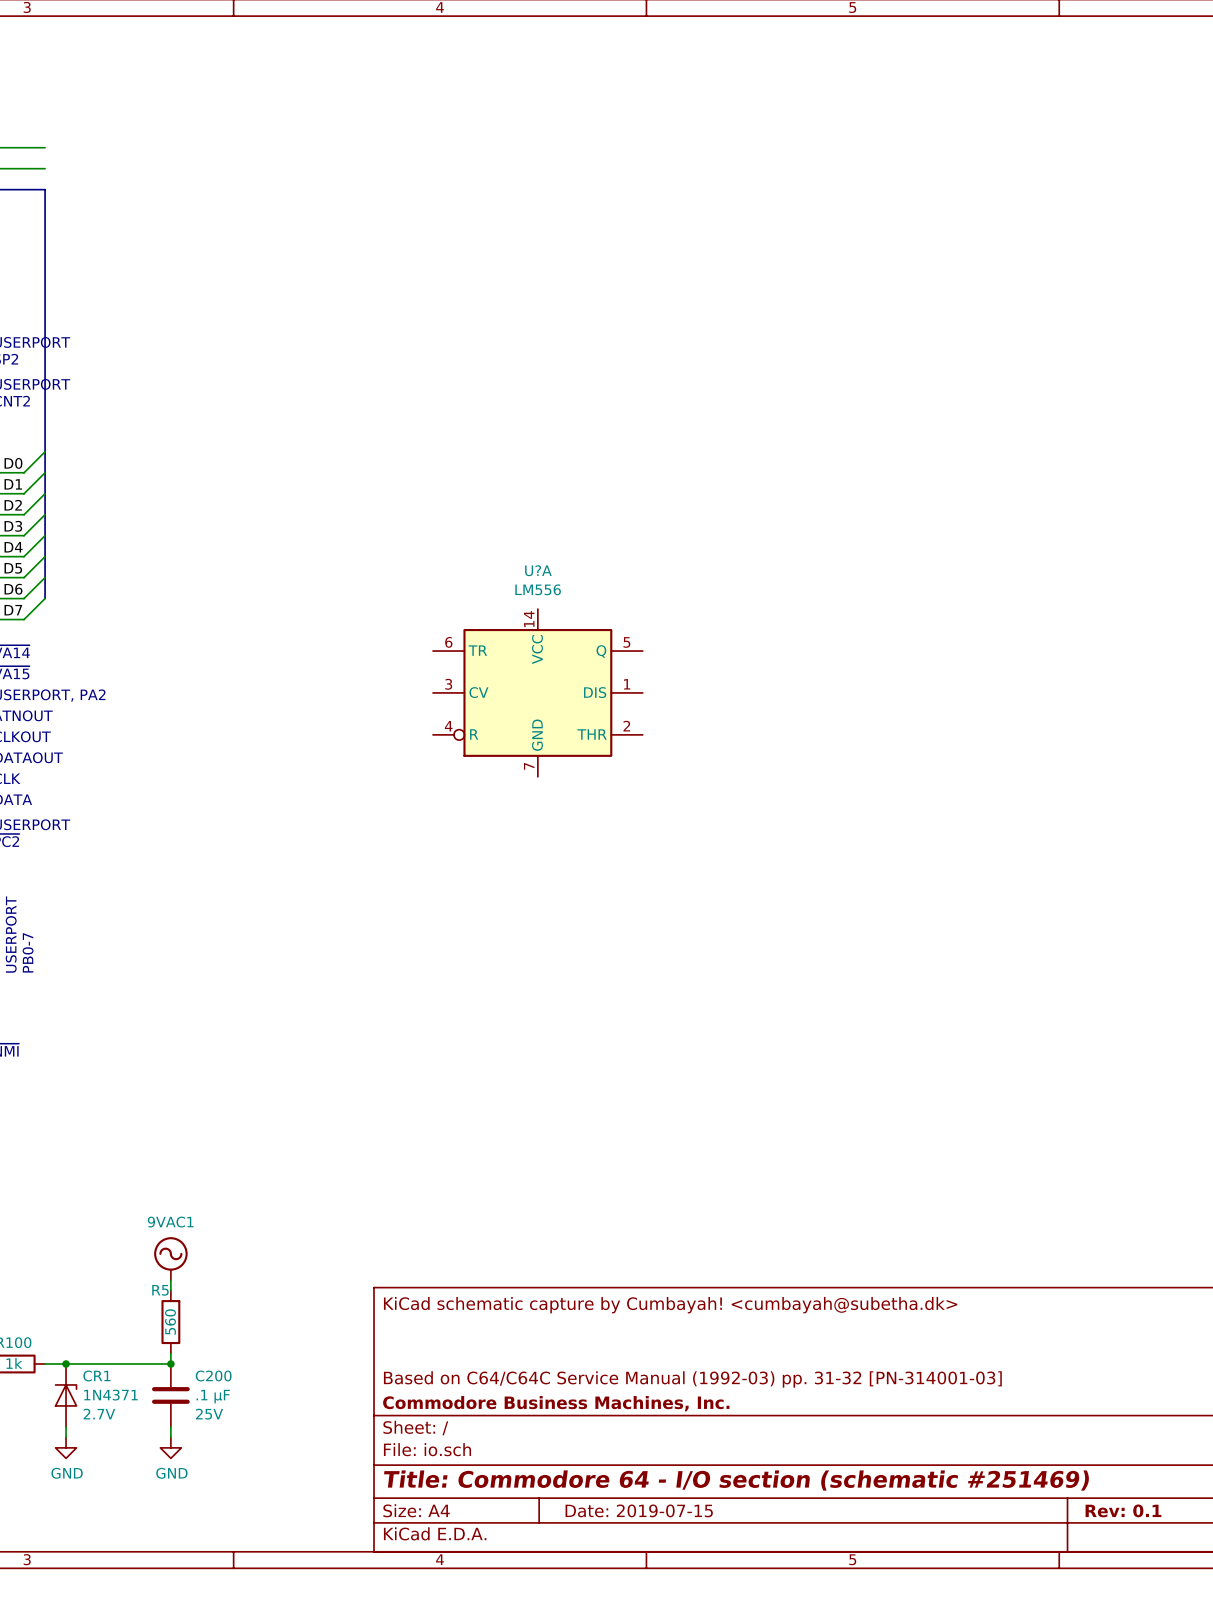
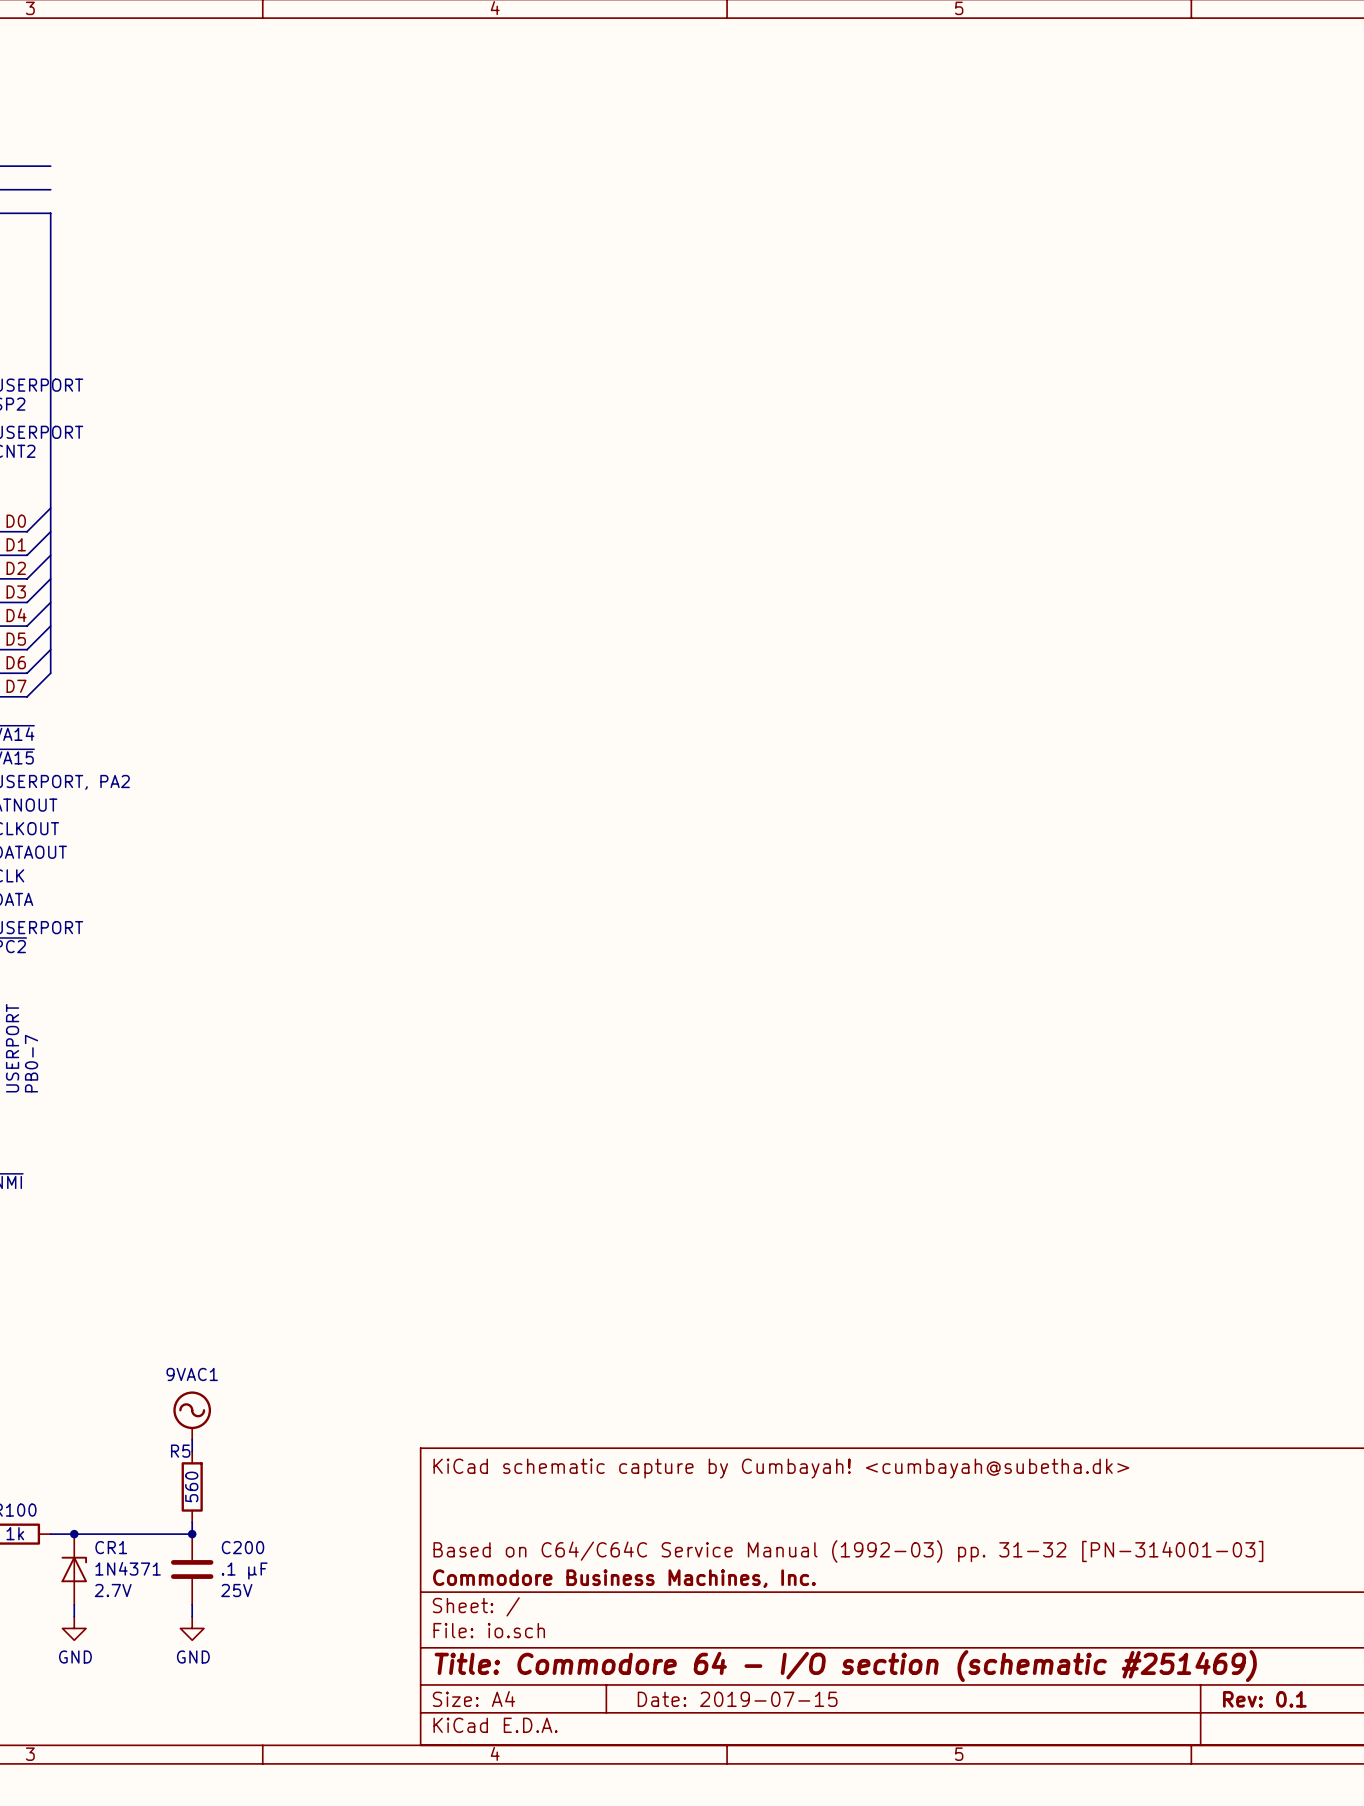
U?A: LM556 (537, 692) -> none

